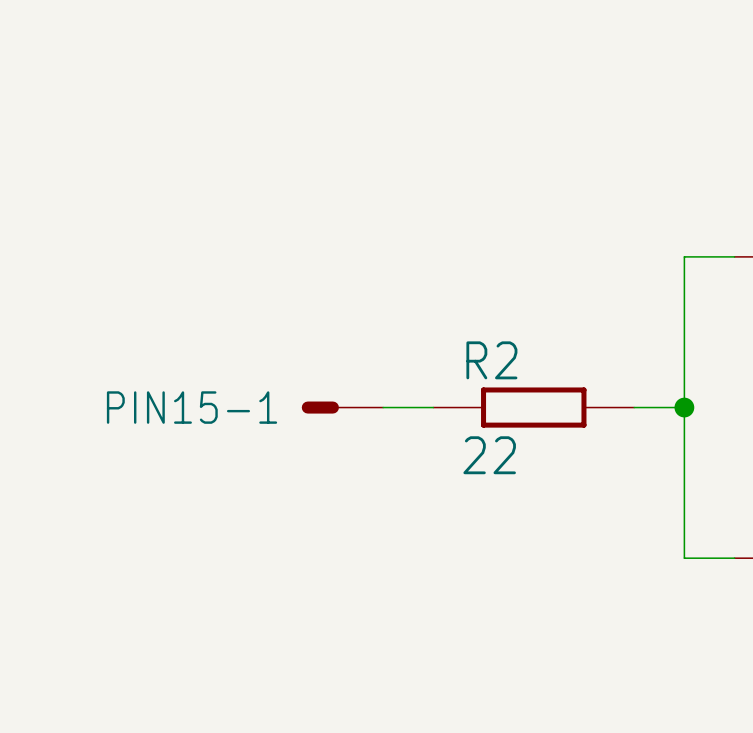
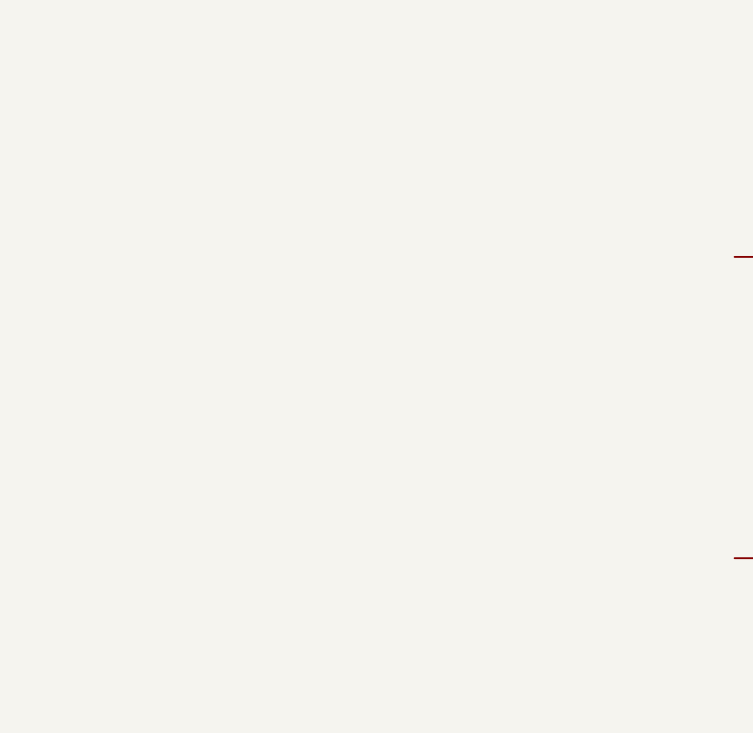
wire: (734, 256) (684, 256) (684, 558) (734, 558) -> none
PIN15-1: (342, 407) -> none
wire: (383, 407) (433, 407) -> none
R2: 22 (533, 407) -> none
wire: (634, 407) (684, 407) -> none
junction: (684, 407) -> none

